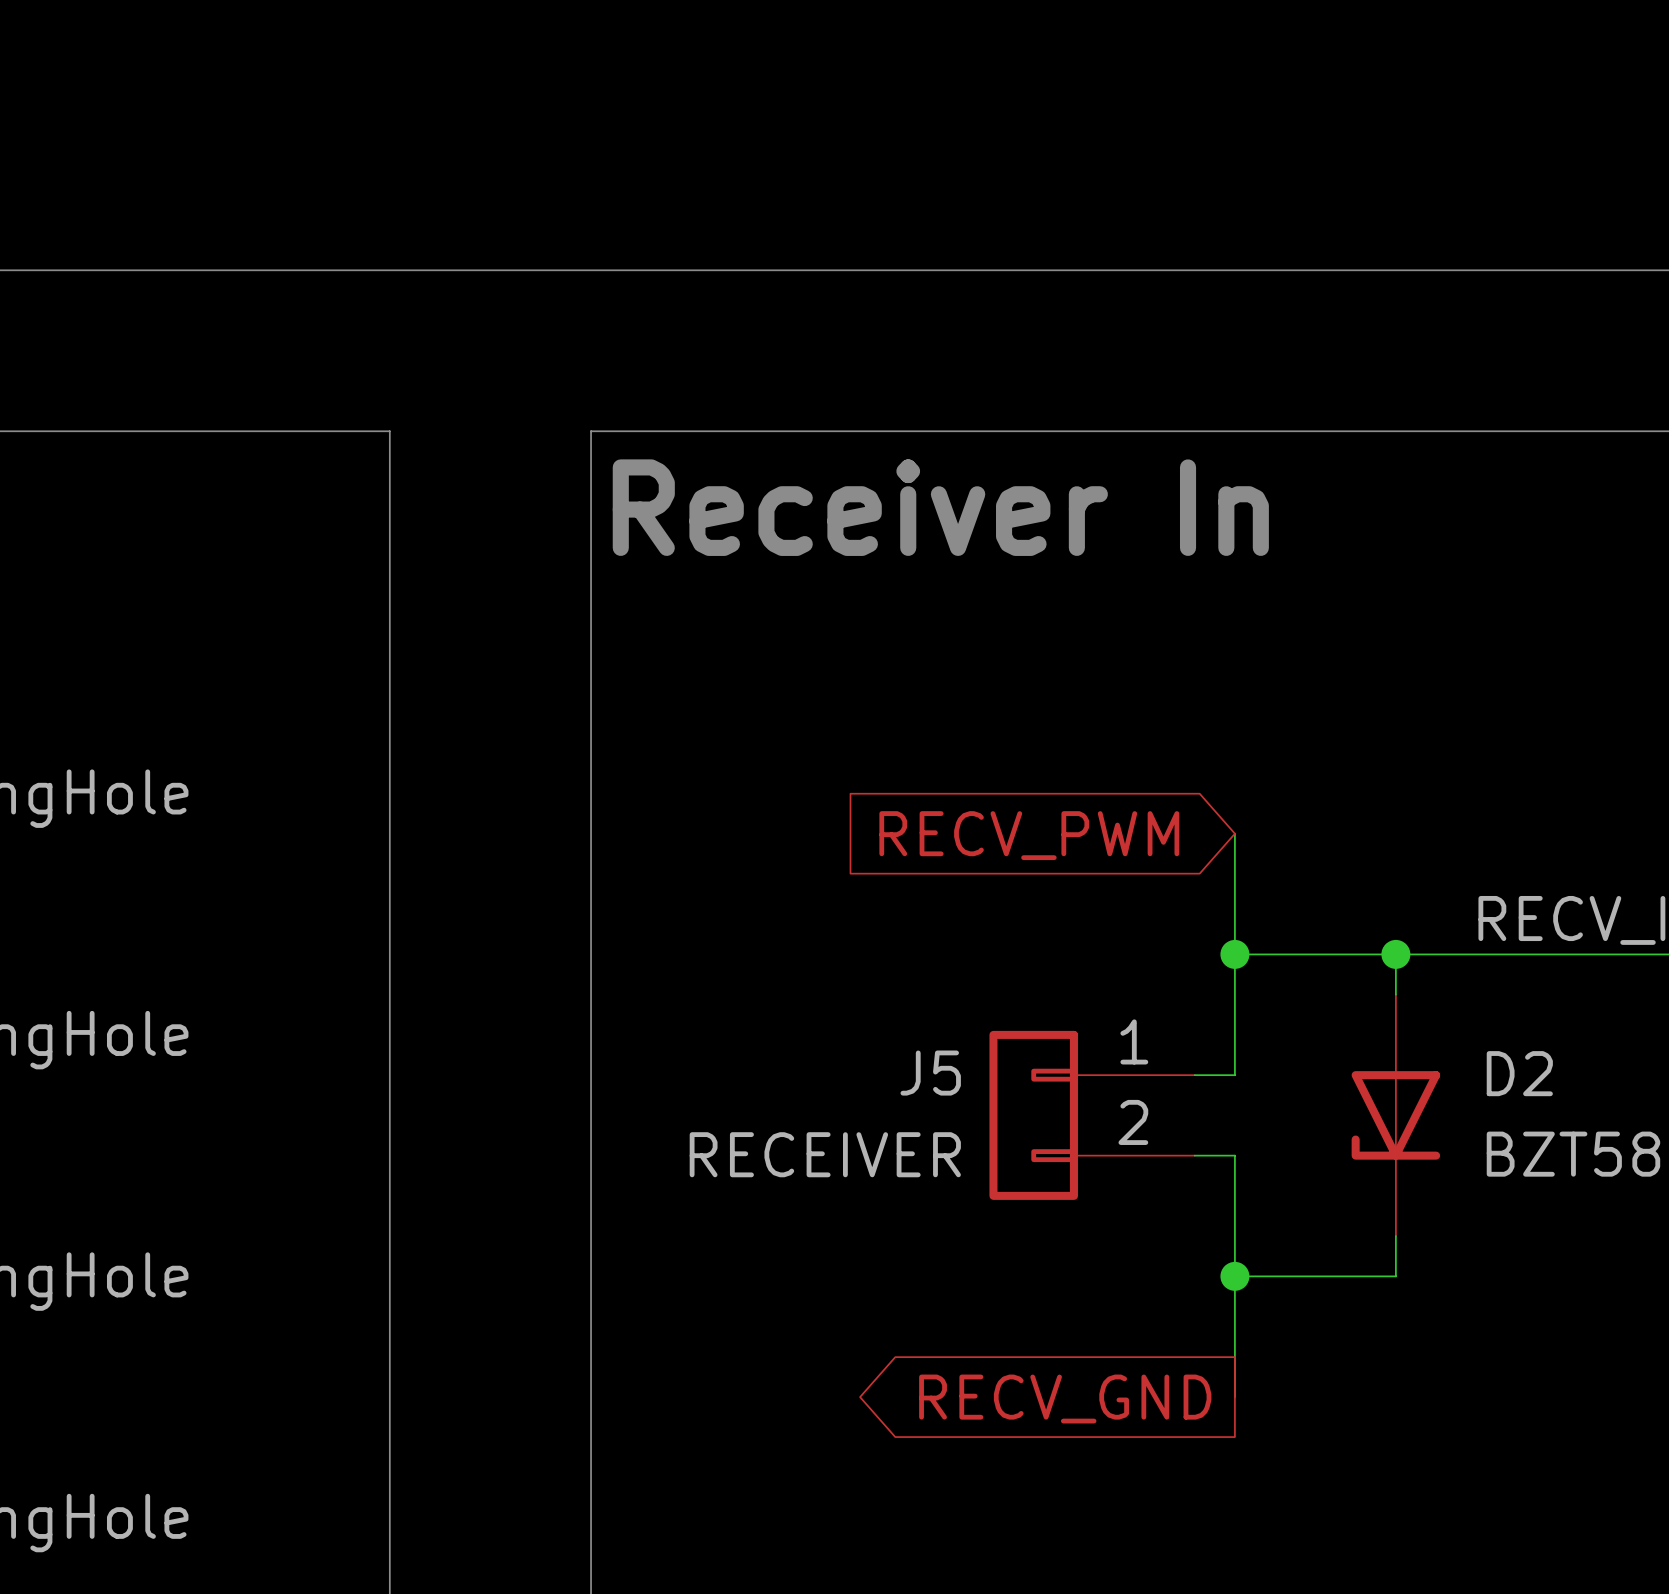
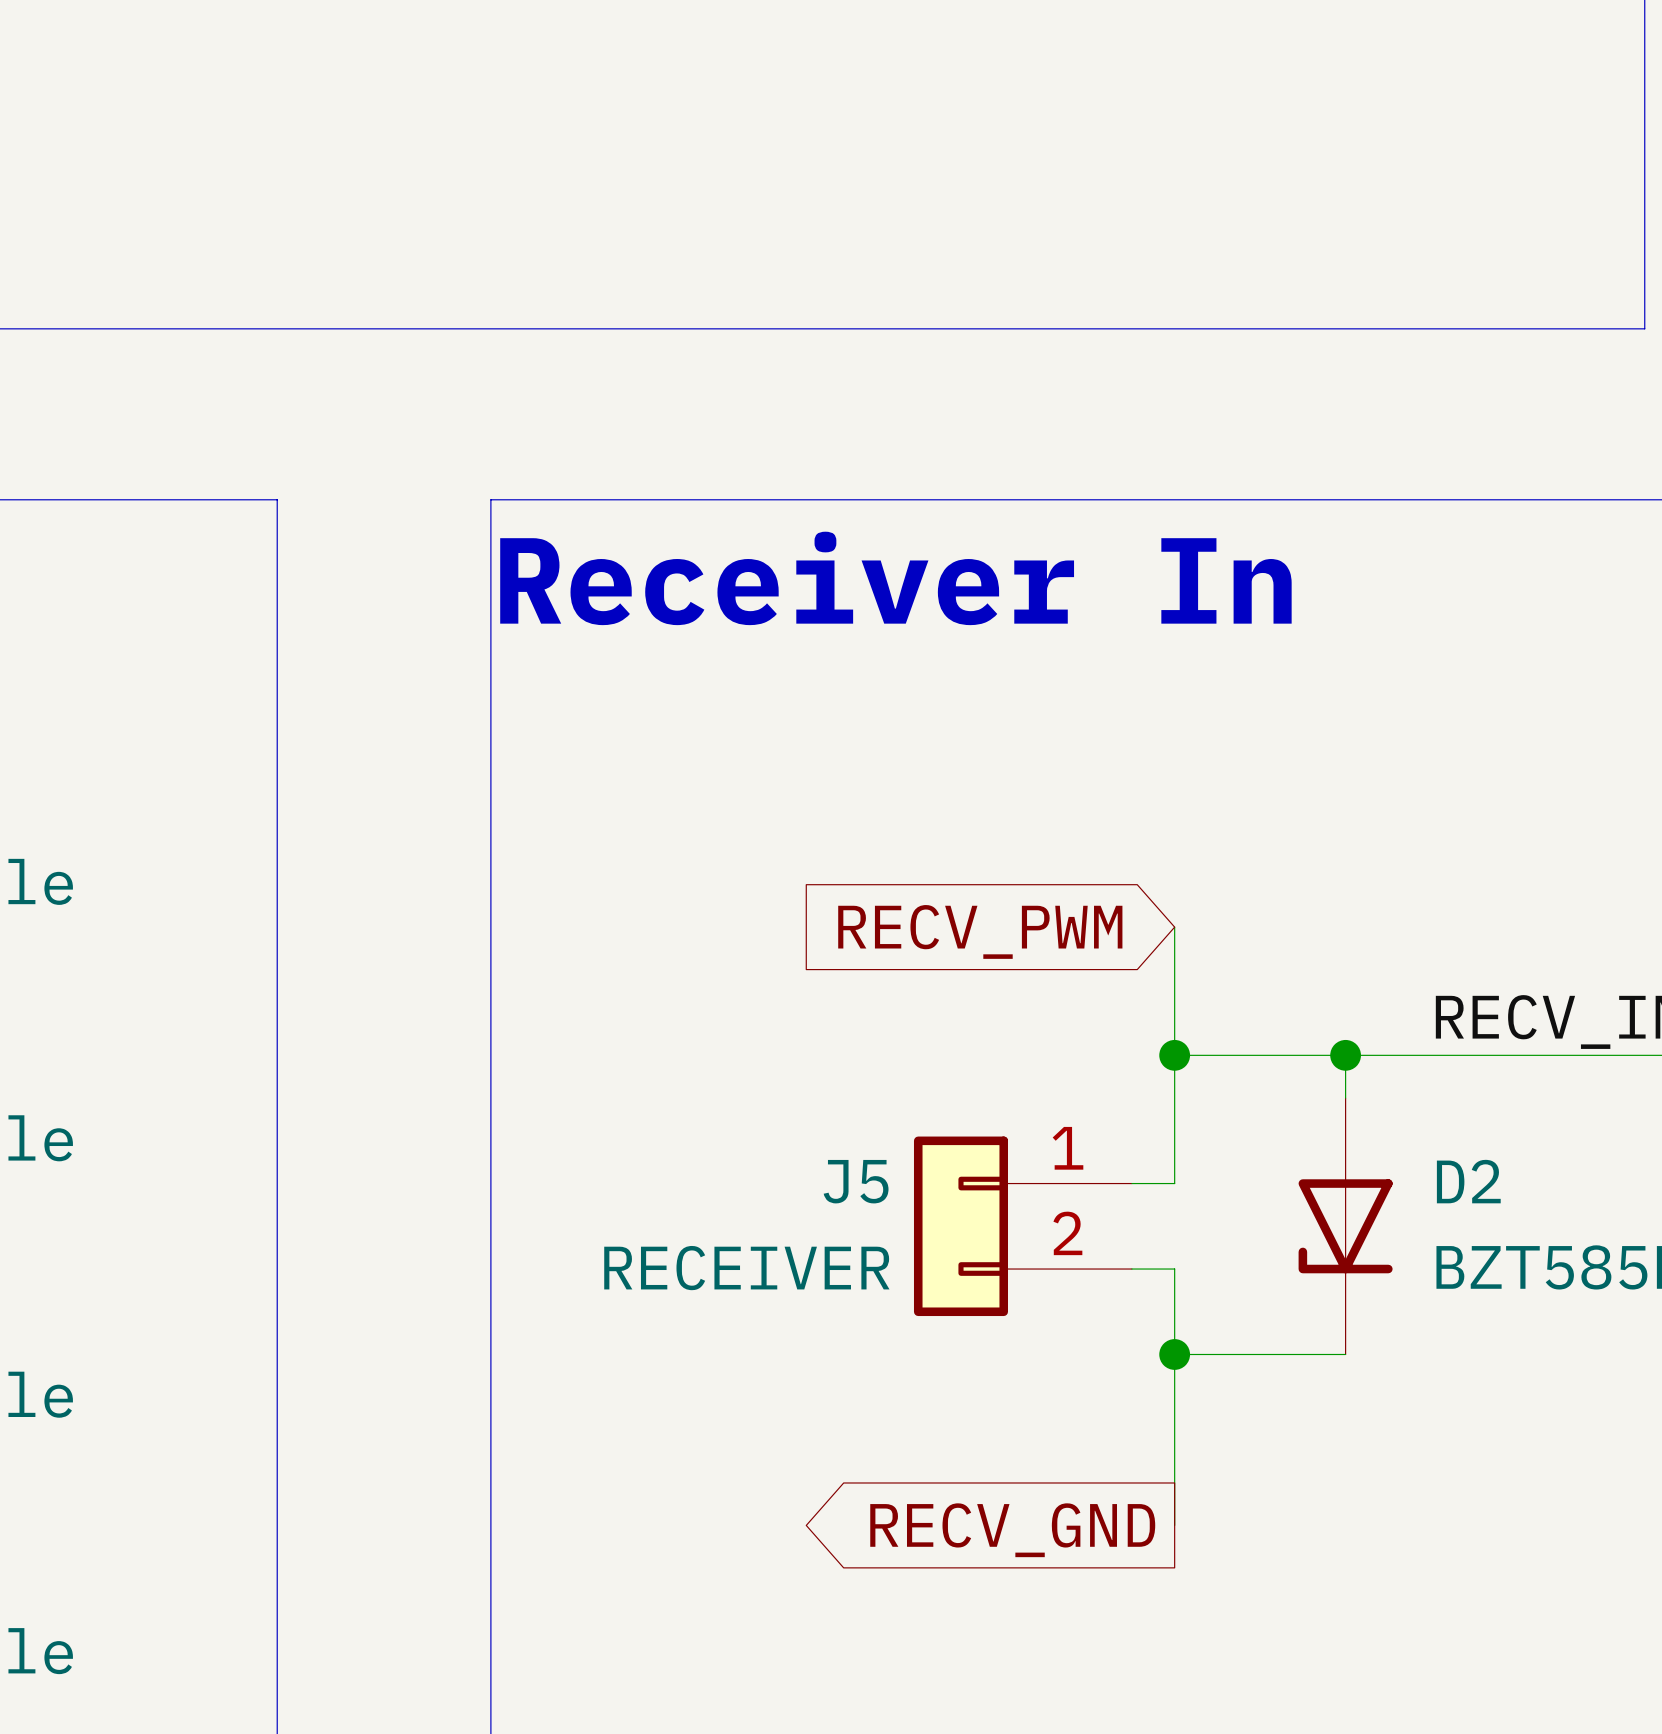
wire: (1395, 1236) (1395, 1276) (1234, 1276) -> (1345, 1354) (1174, 1354)
junction position: (1234, 1276) -> (1174, 1354)

